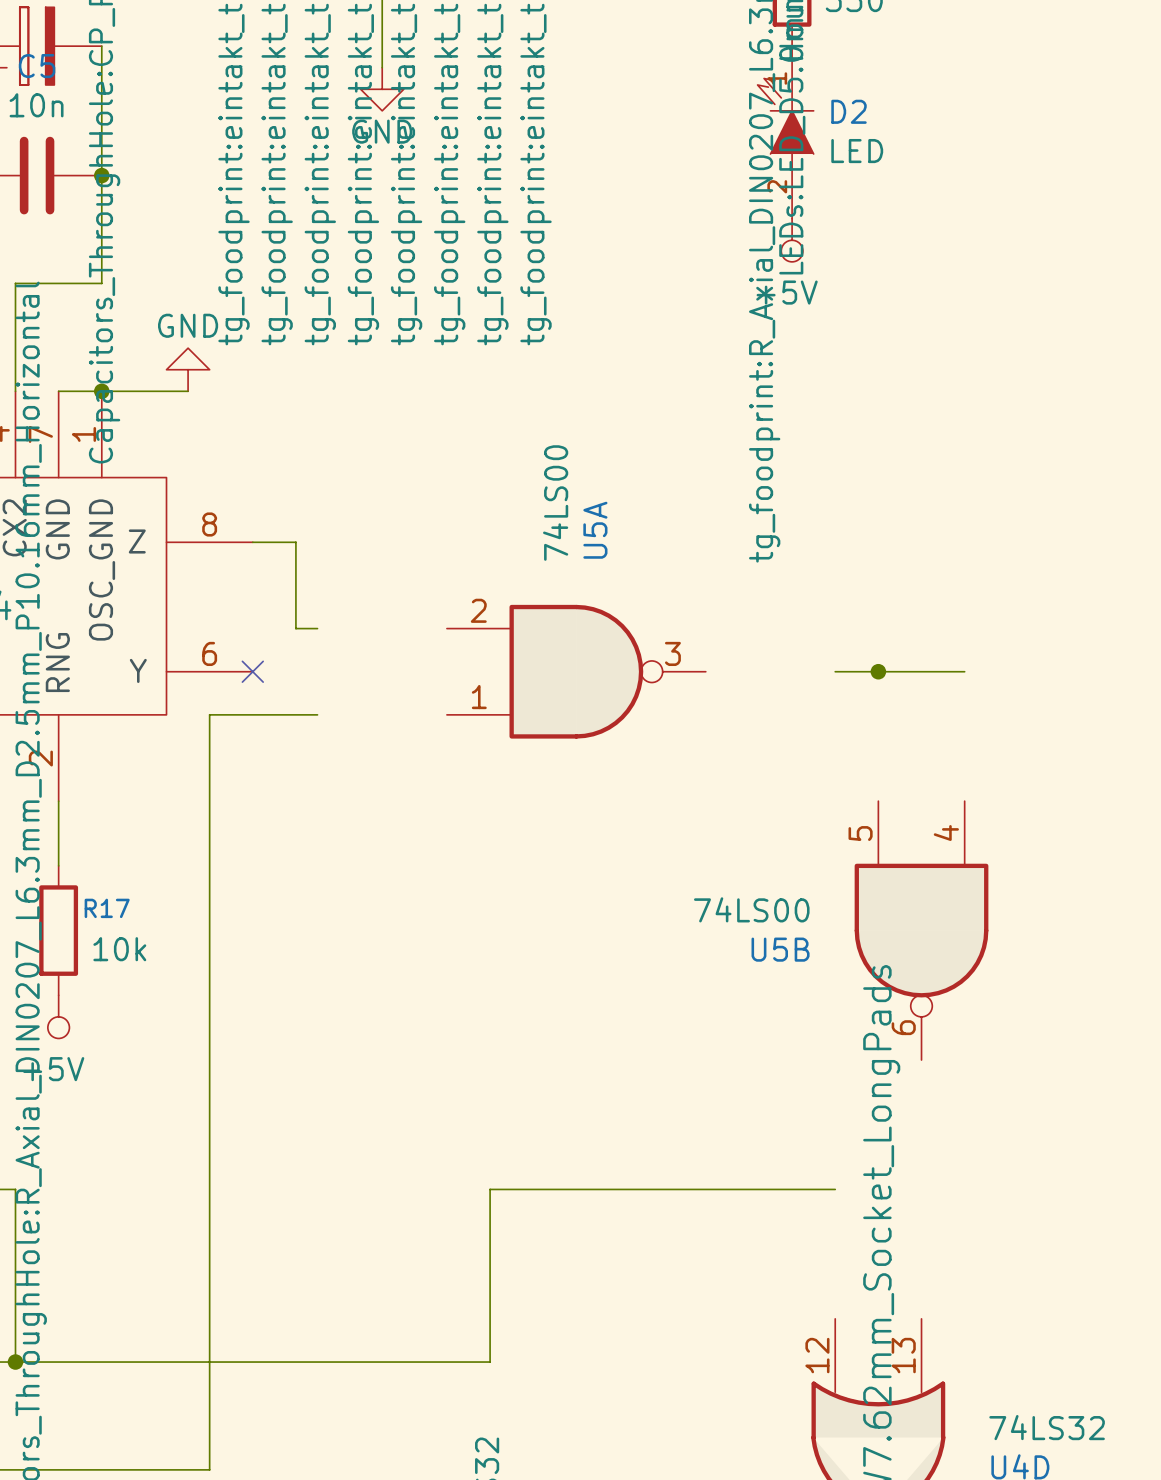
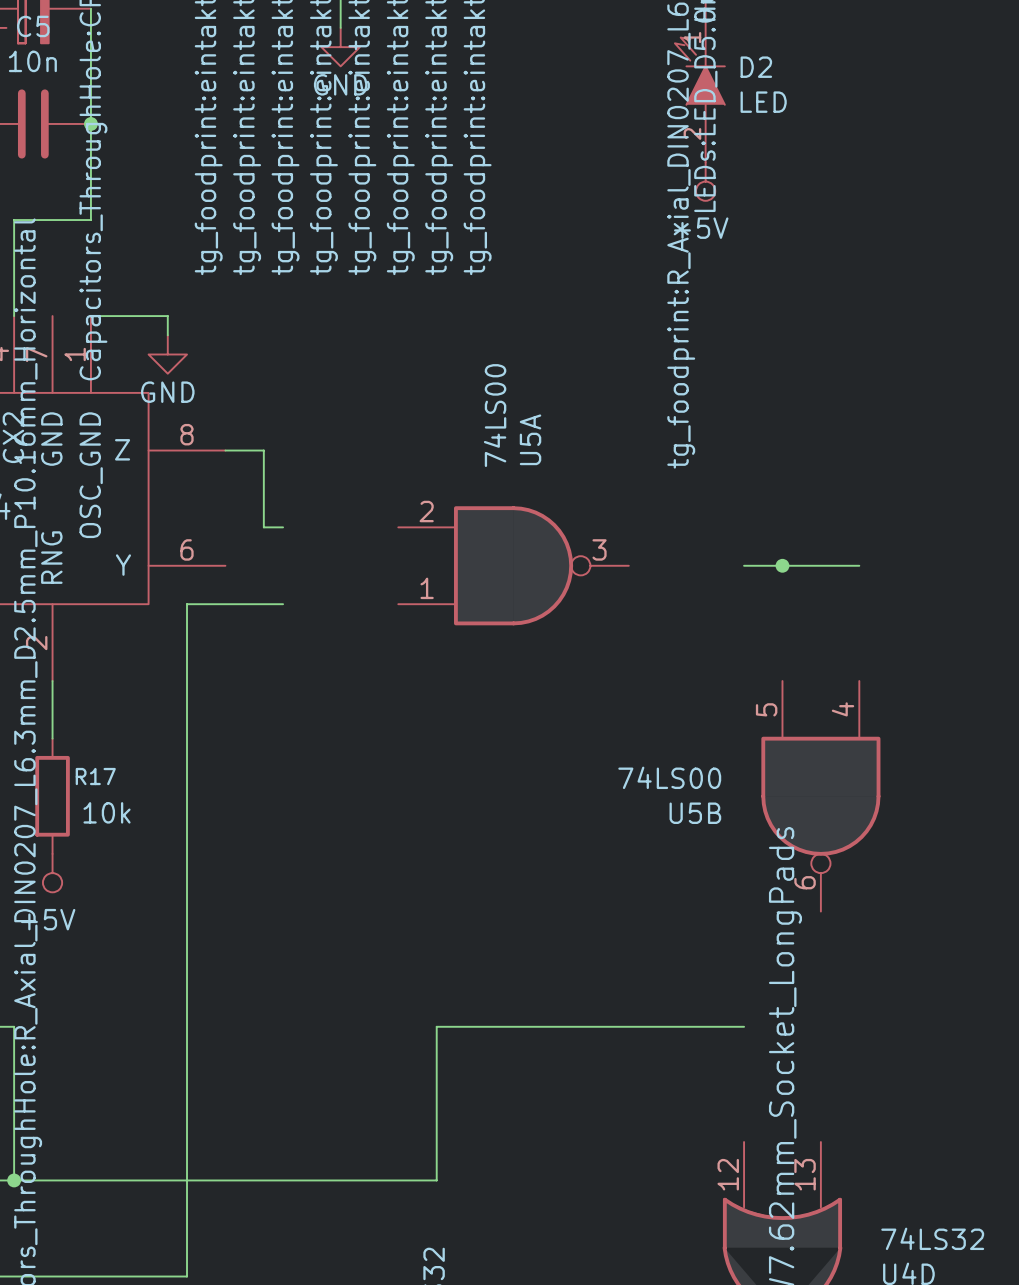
power symbol rotation: 0° (188, 369) -> 180° (167, 354)
power symbol position: GND (188, 369) -> GND (167, 354)
wire: (58, 391) (101, 391) -> none
junction: (101, 391) -> none
wire: none -> (167, 316) (167, 335)
no-connect mark: (252, 671) -> none

